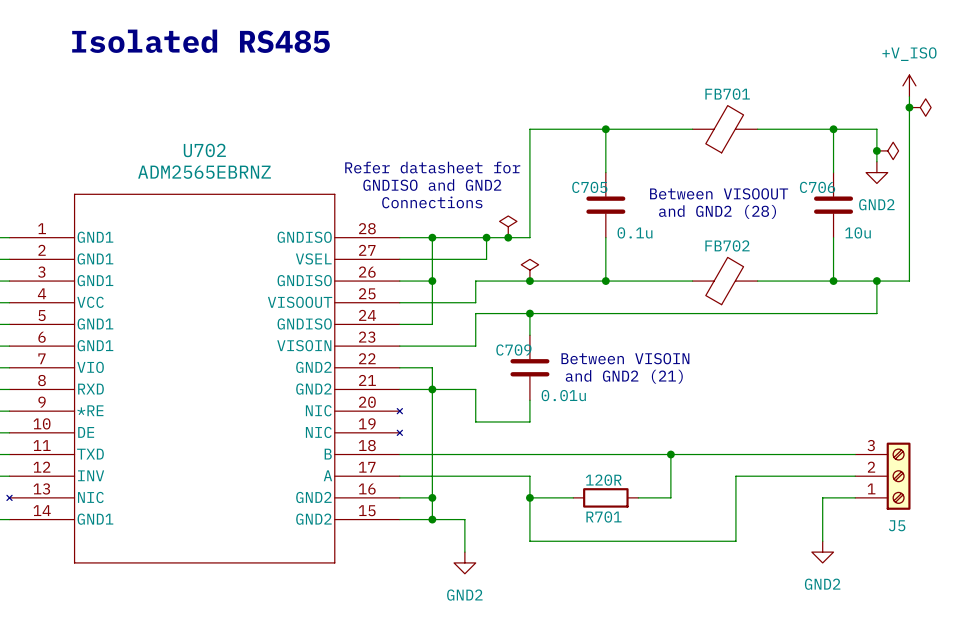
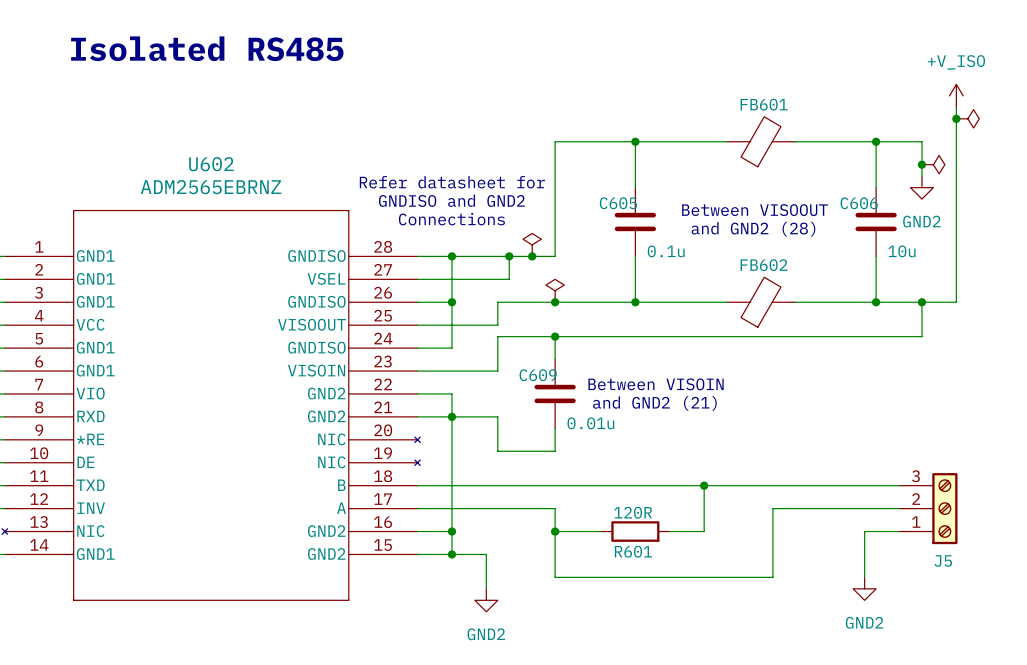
FB701 name: FB701 (727, 94) -> FB601 (764, 104)
U702 name: U702 (204, 150) -> U602 (211, 164)
C705 name: C705 (589, 187) -> C605 (618, 203)
C706 name: C706 (817, 187) -> C606 (859, 203)
FB702 name: FB702 (727, 245) -> FB602 (763, 265)
C709 name: C709 (513, 350) -> C609 (538, 375)
R701 name: R701 (604, 517) -> R601 (633, 551)

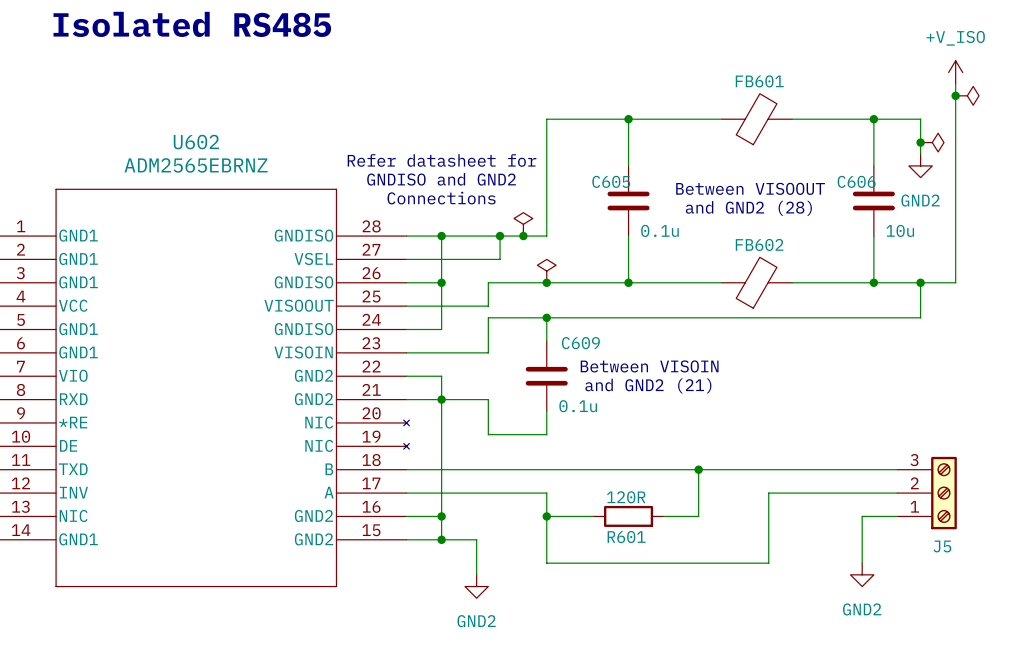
C609 name position: C609 (538, 375) -> C609 (580, 343)
C609 value: 0.01u (590, 423) -> 0.1u (578, 406)

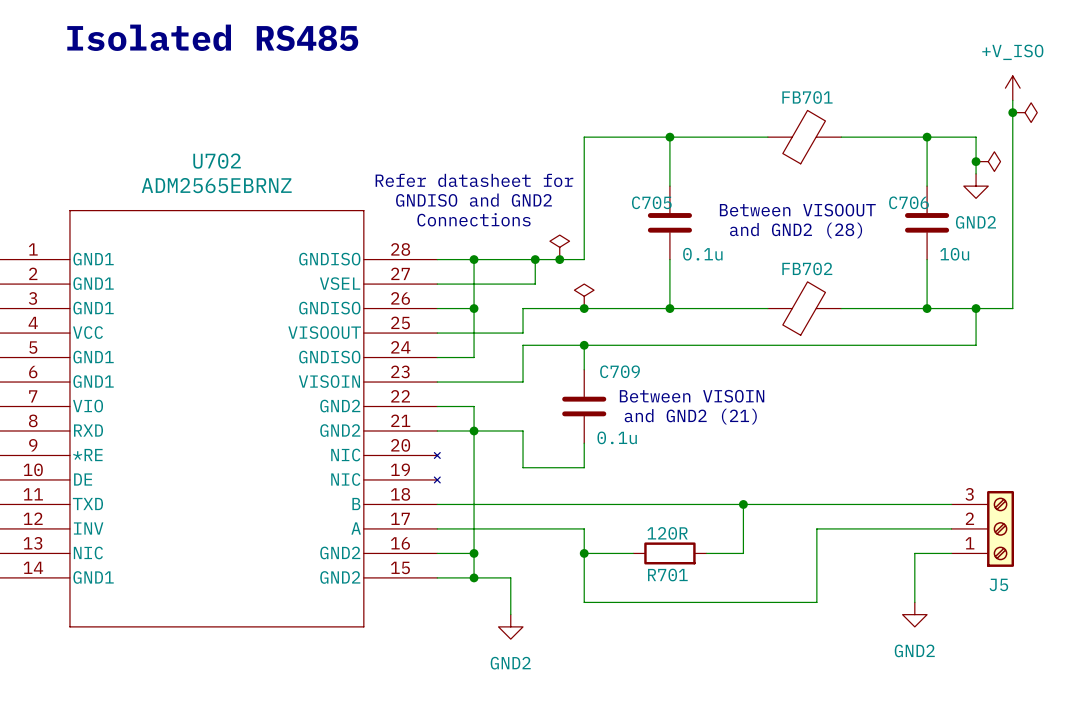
FB601 name: FB601 (759, 81) -> FB701 (807, 97)
U602 name: U602 (196, 142) -> U702 (217, 161)
C605 name: C605 (611, 181) -> C705 (651, 202)
C606 name: C606 (856, 181) -> C706 (908, 202)
FB602 name: FB602 (759, 244) -> FB702 (807, 268)
C609 name: C609 (580, 343) -> C709 (620, 371)
R601 name: R601 (626, 537) -> R701 (667, 575)

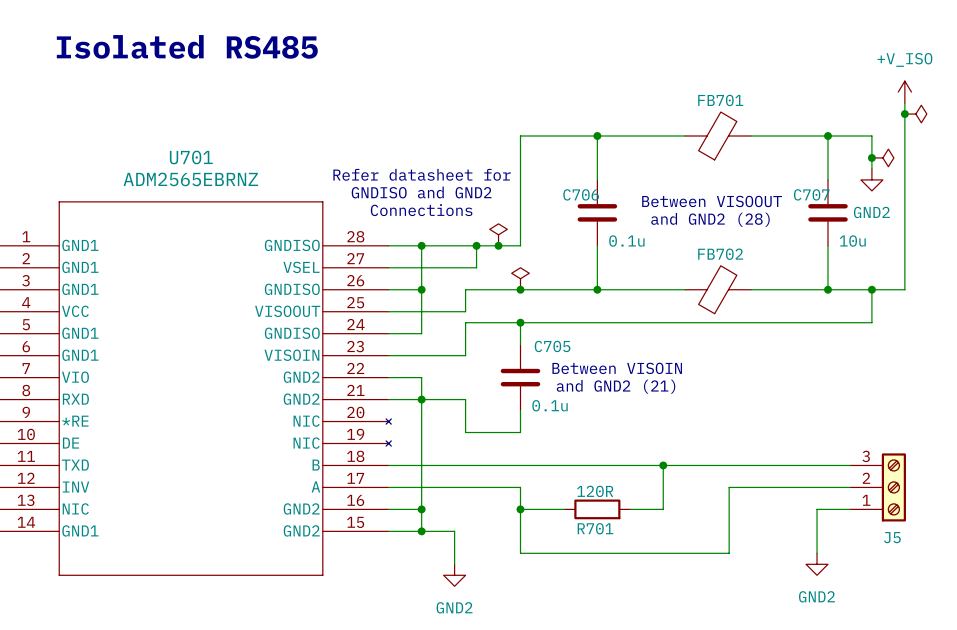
U702 name: U702 (217, 161) -> U701 (191, 157)
C705 name: C705 (651, 202) -> C706 (581, 194)
C706 name: C706 (908, 202) -> C707 (811, 194)
C709 name: C709 (620, 371) -> C705 (552, 346)

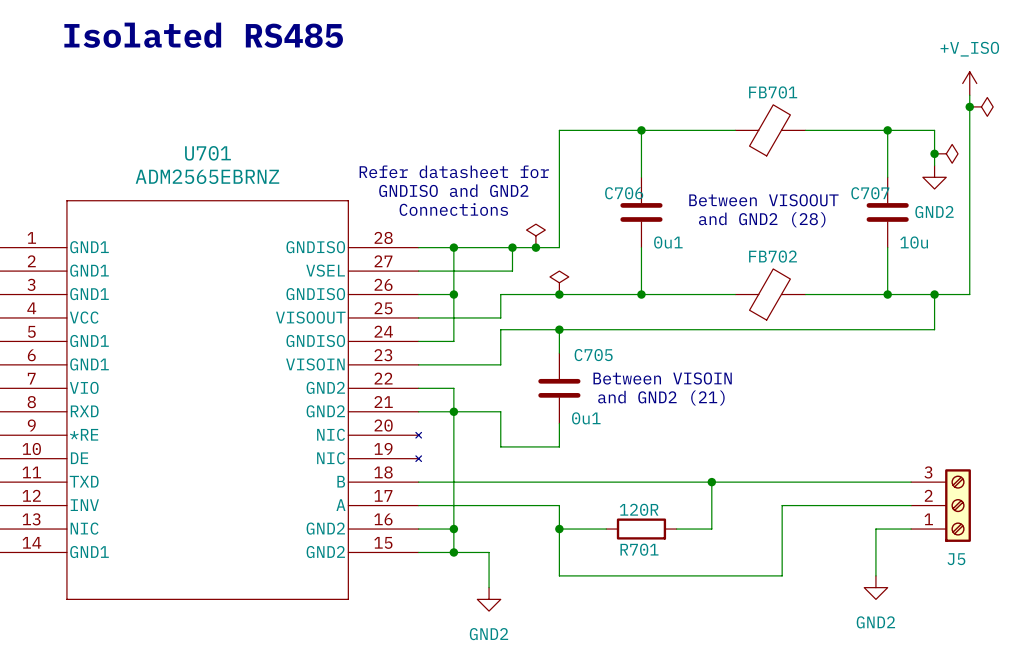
C706 value: 0.1u (626, 241) -> 0u1 (668, 242)
C705 value: 0.1u (550, 405) -> 0u1 (586, 418)

